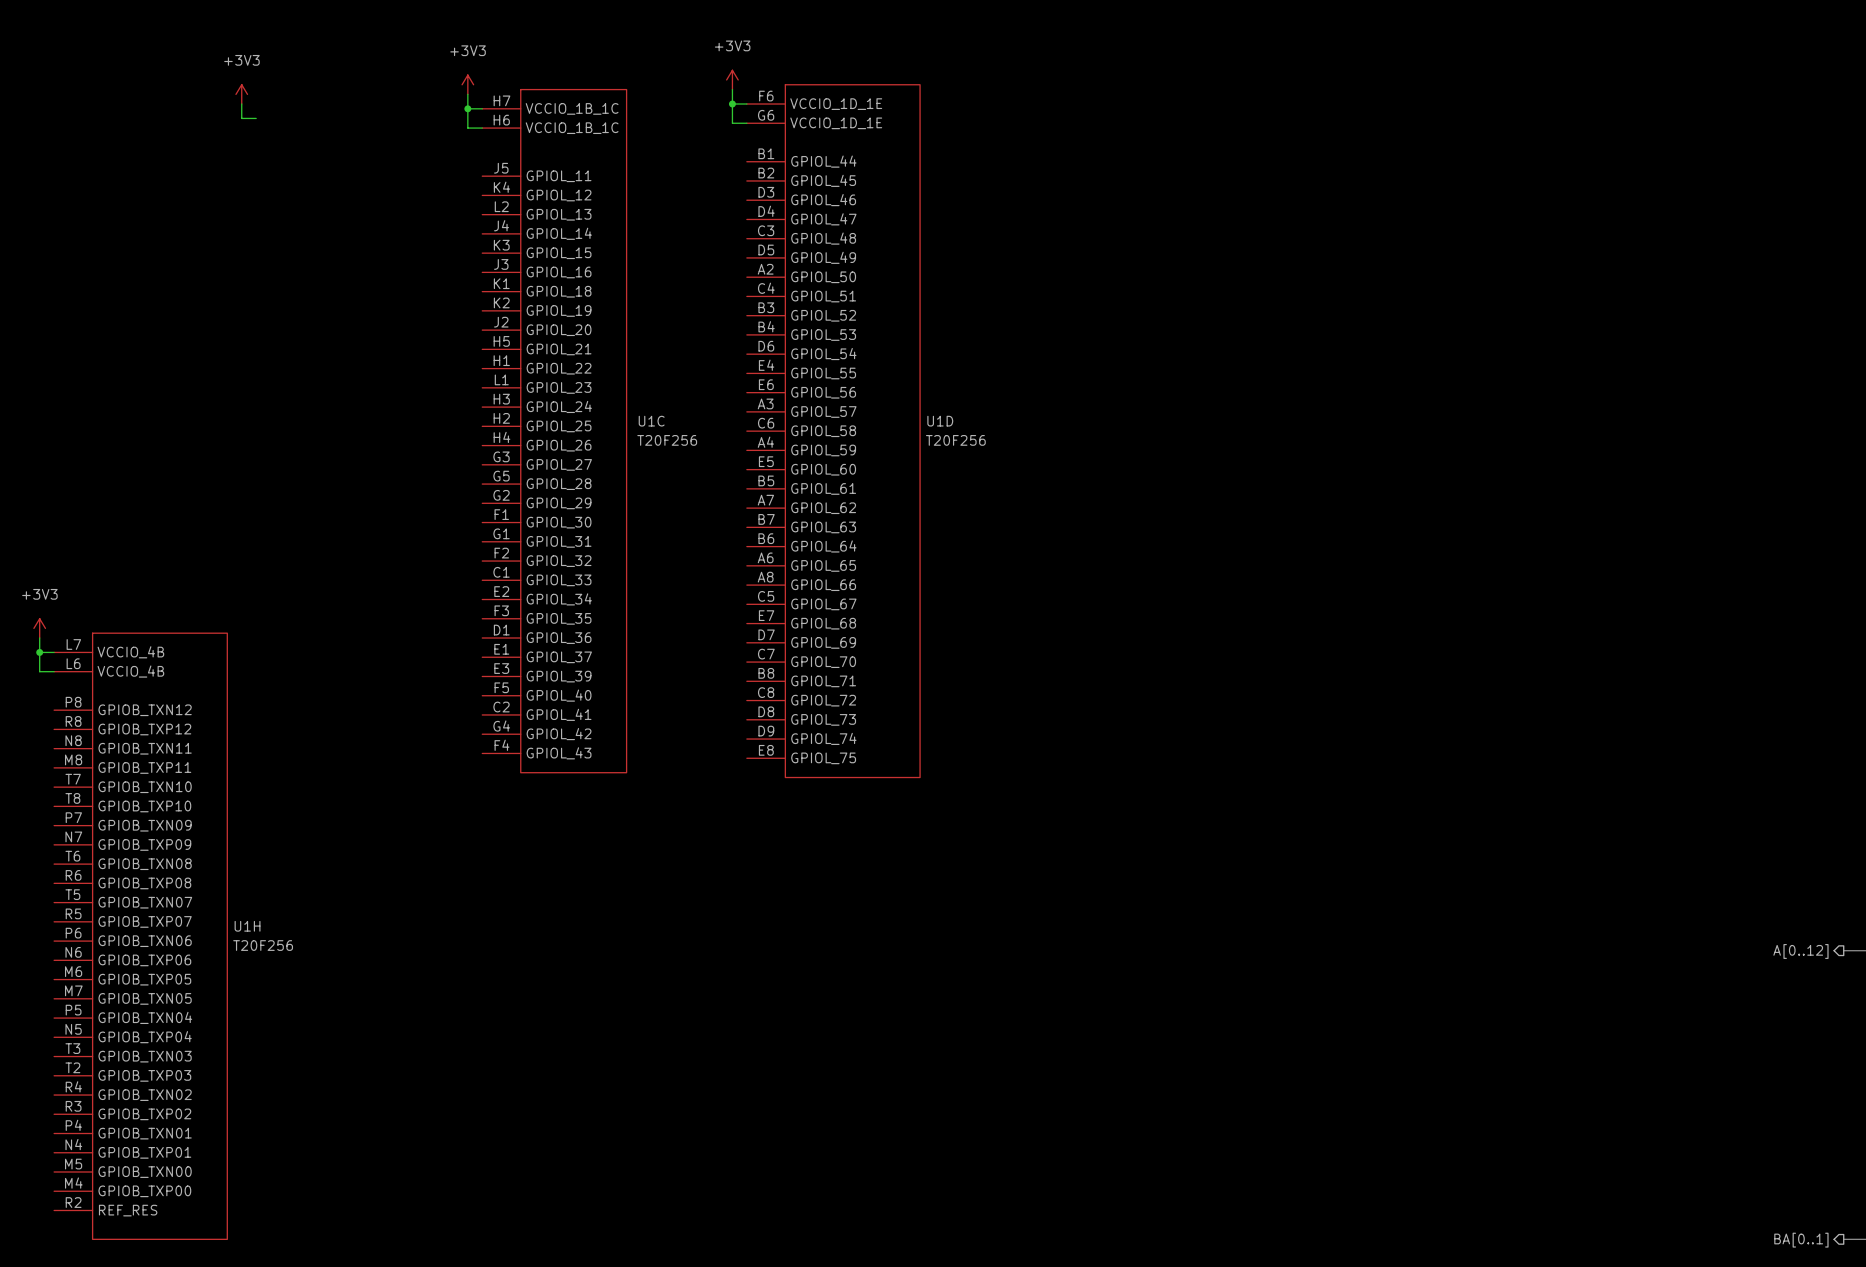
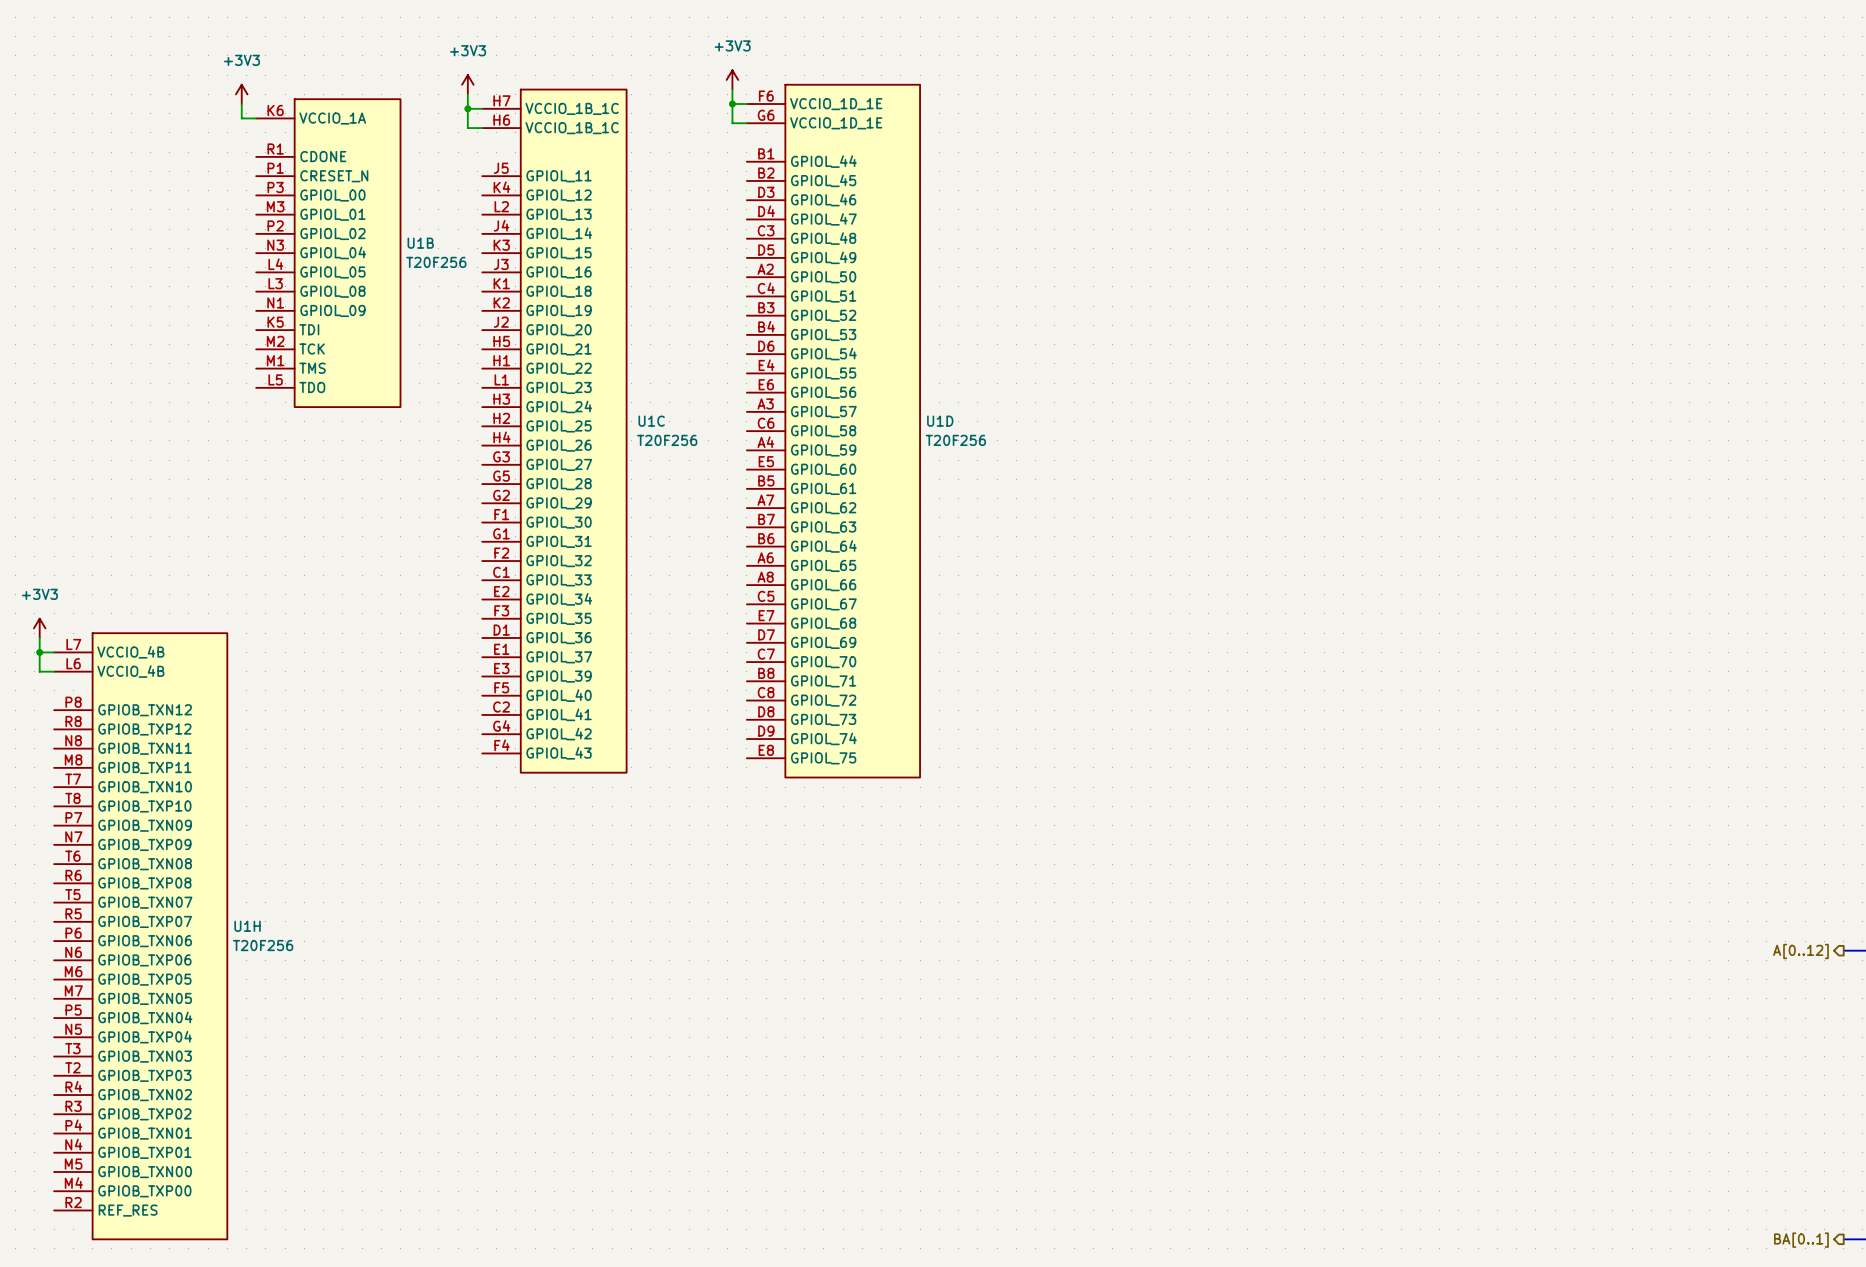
U1B: none -> T20F256 (328, 253)

